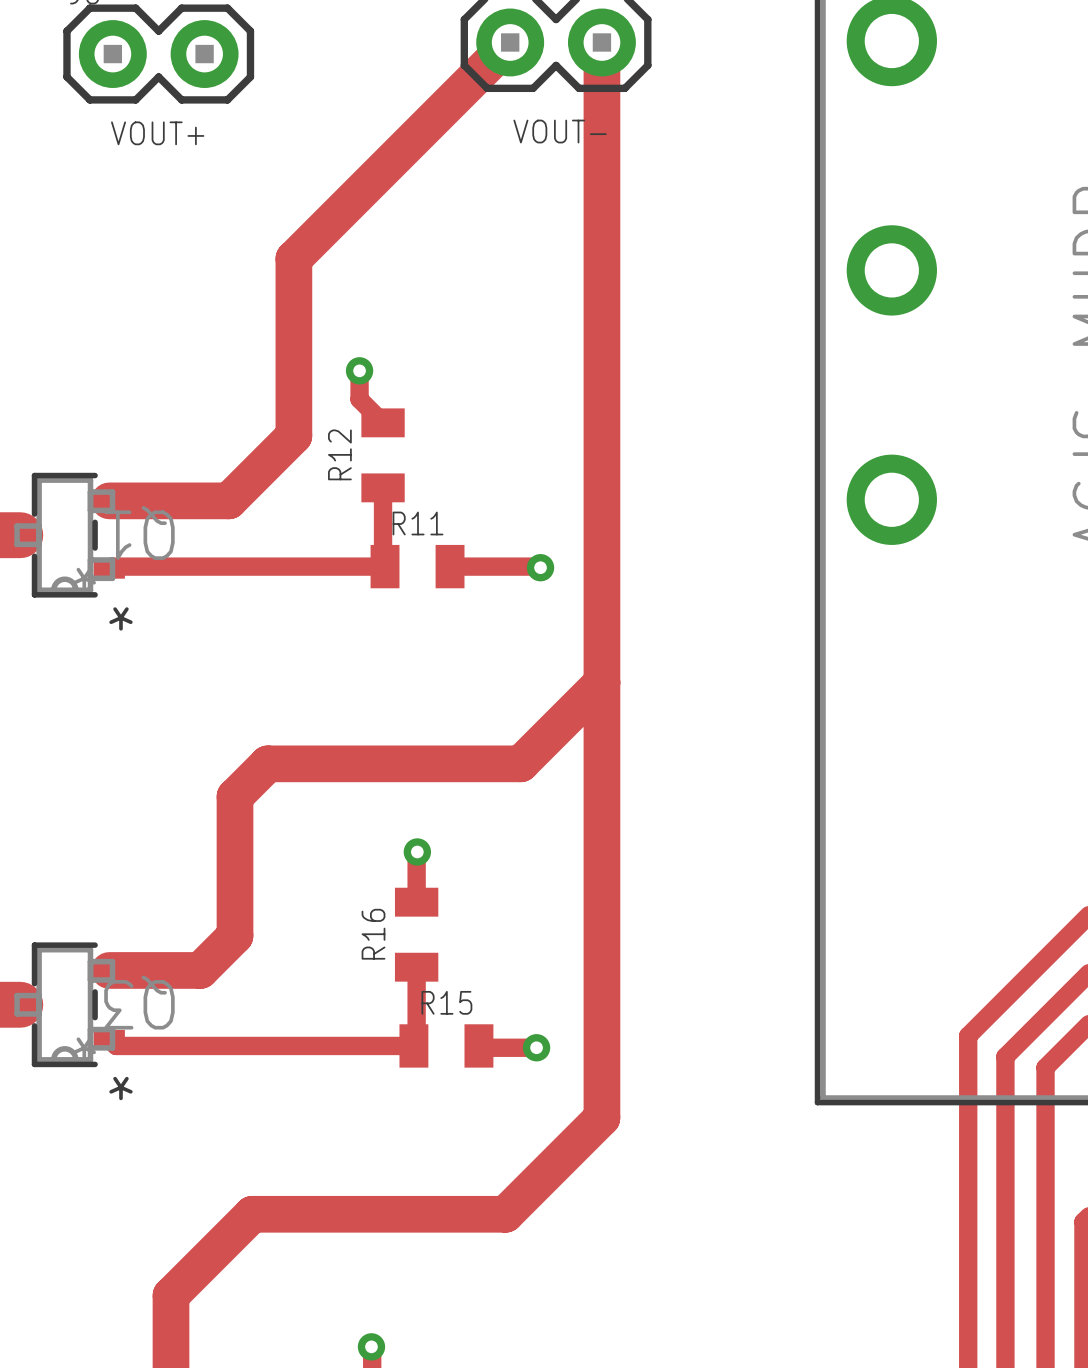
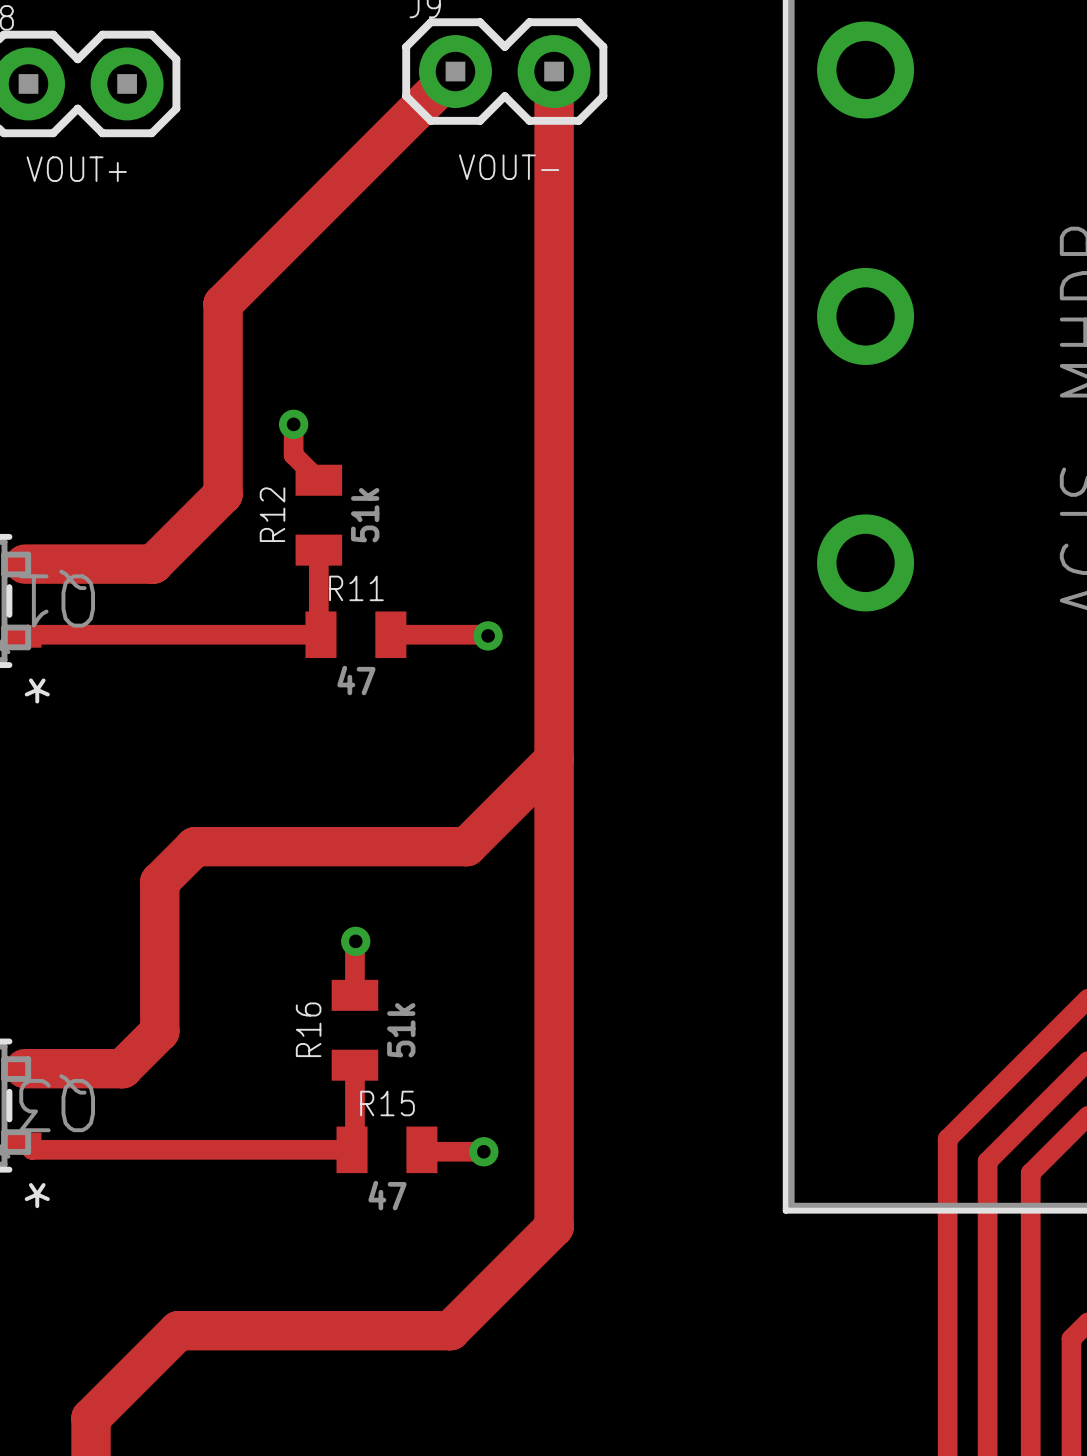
R12 value: none -> 51k (365, 515)
R11 value: none -> 47 (356, 680)
R16 value: none -> 51k (401, 1030)
R15 value: none -> 47 (387, 1195)

